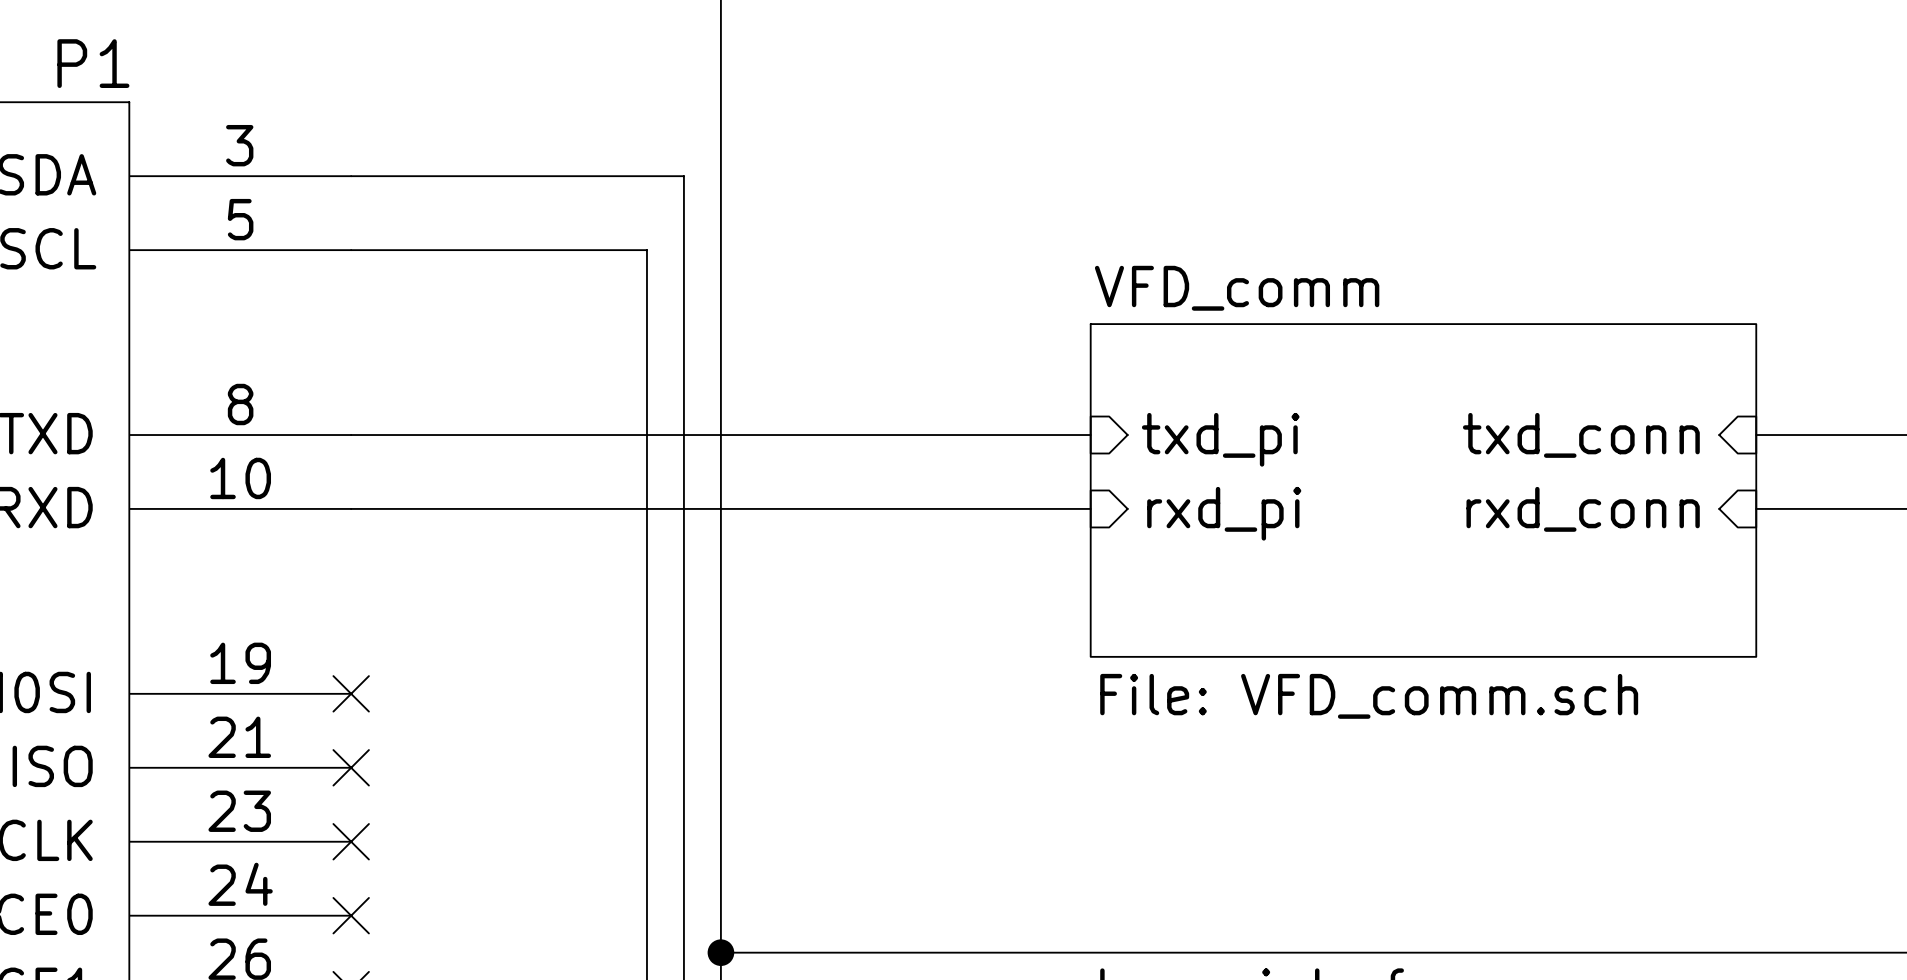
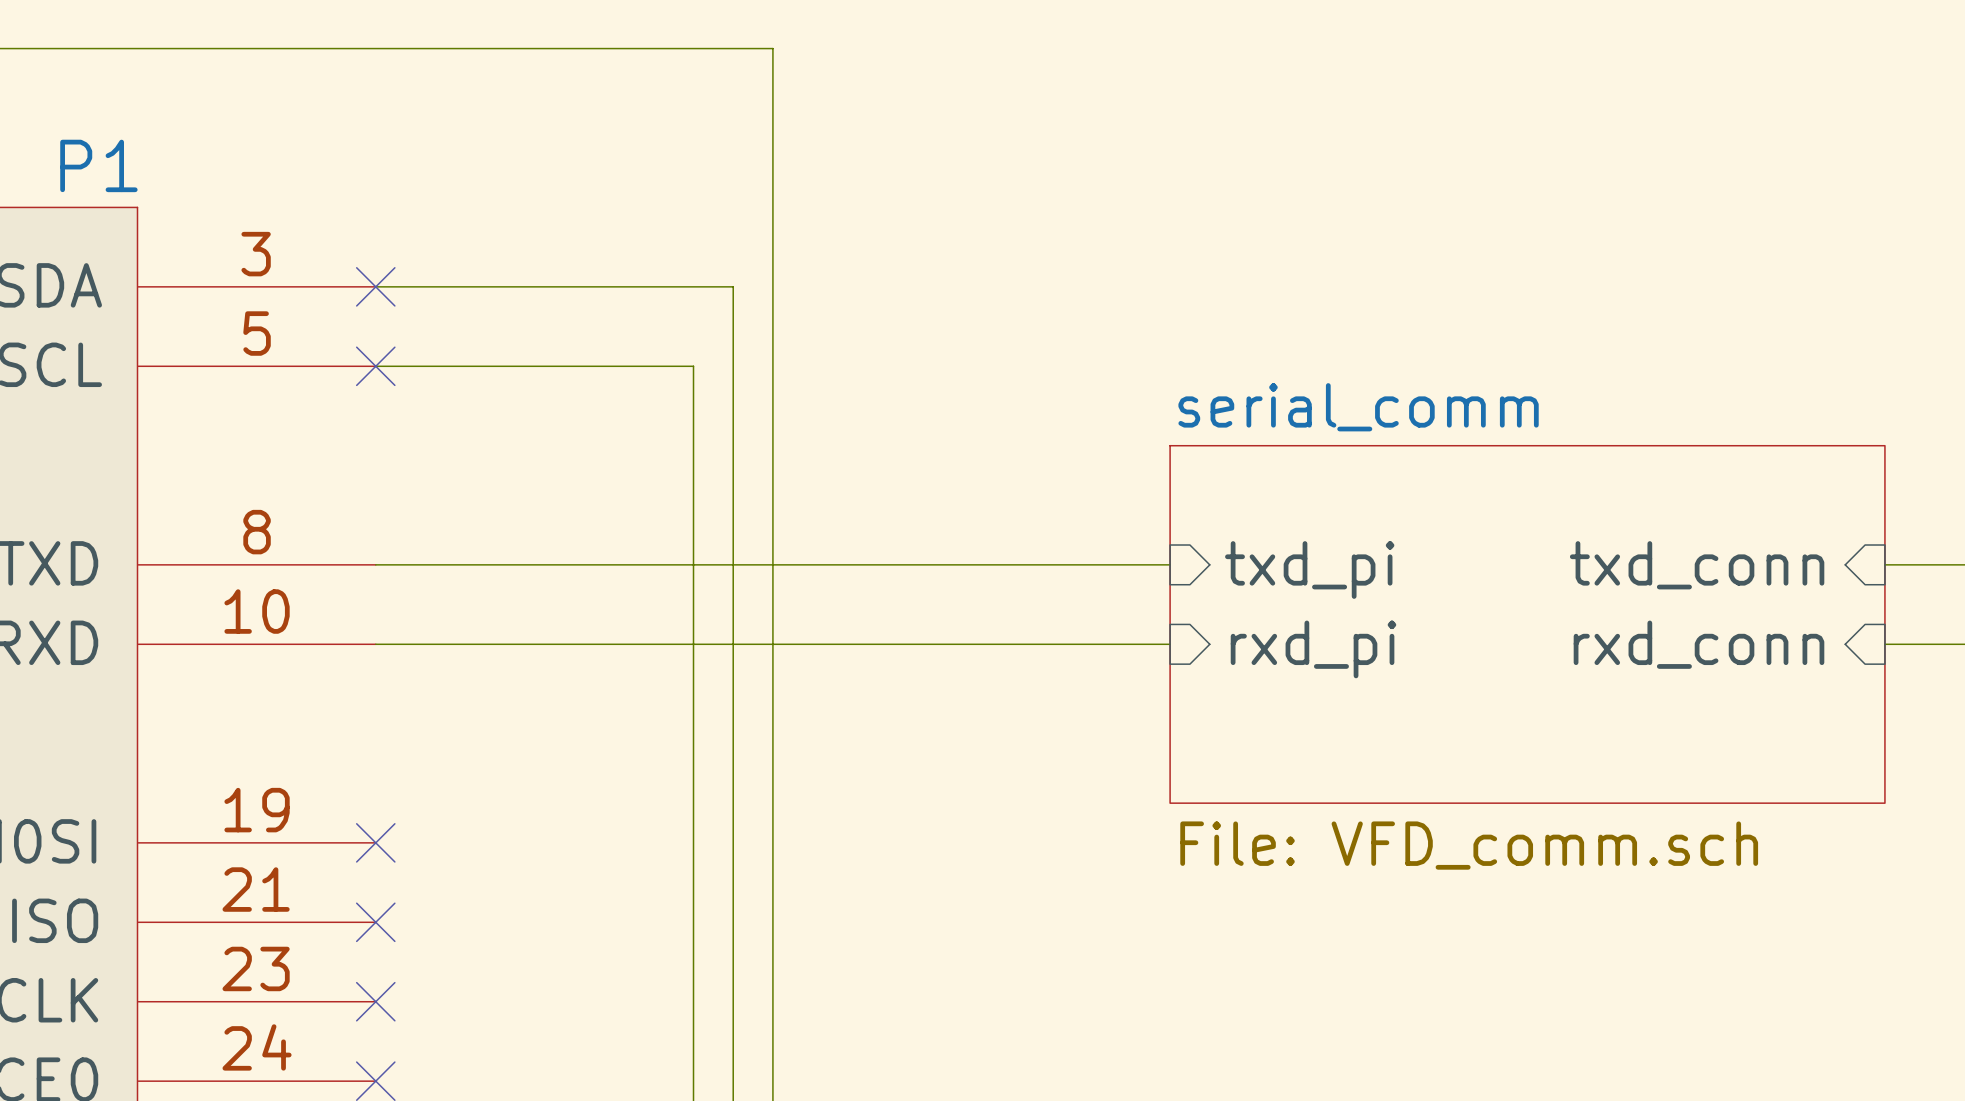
no-connect mark: none -> (375, 286)
no-connect mark: none -> (375, 366)
sheet VFD_comm name: VFD_comm (1237, 288) -> serial_comm (1358, 407)

